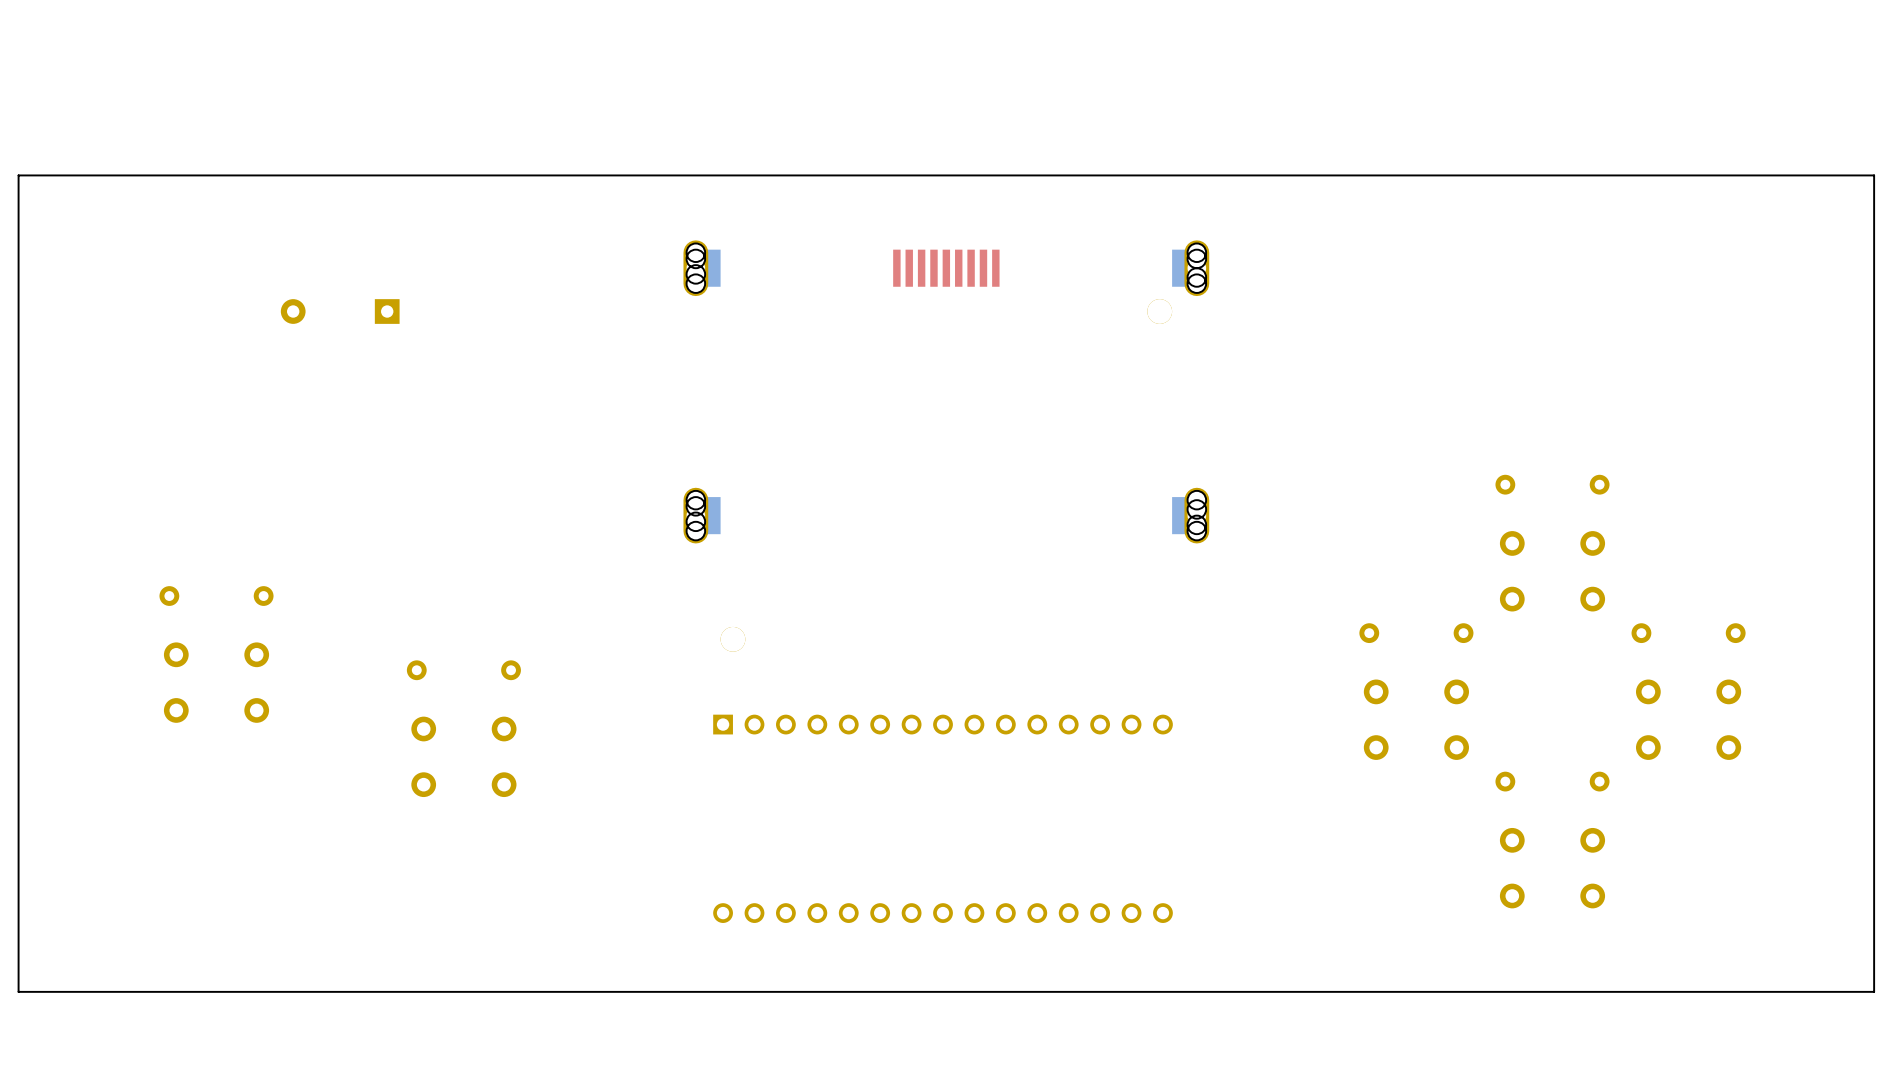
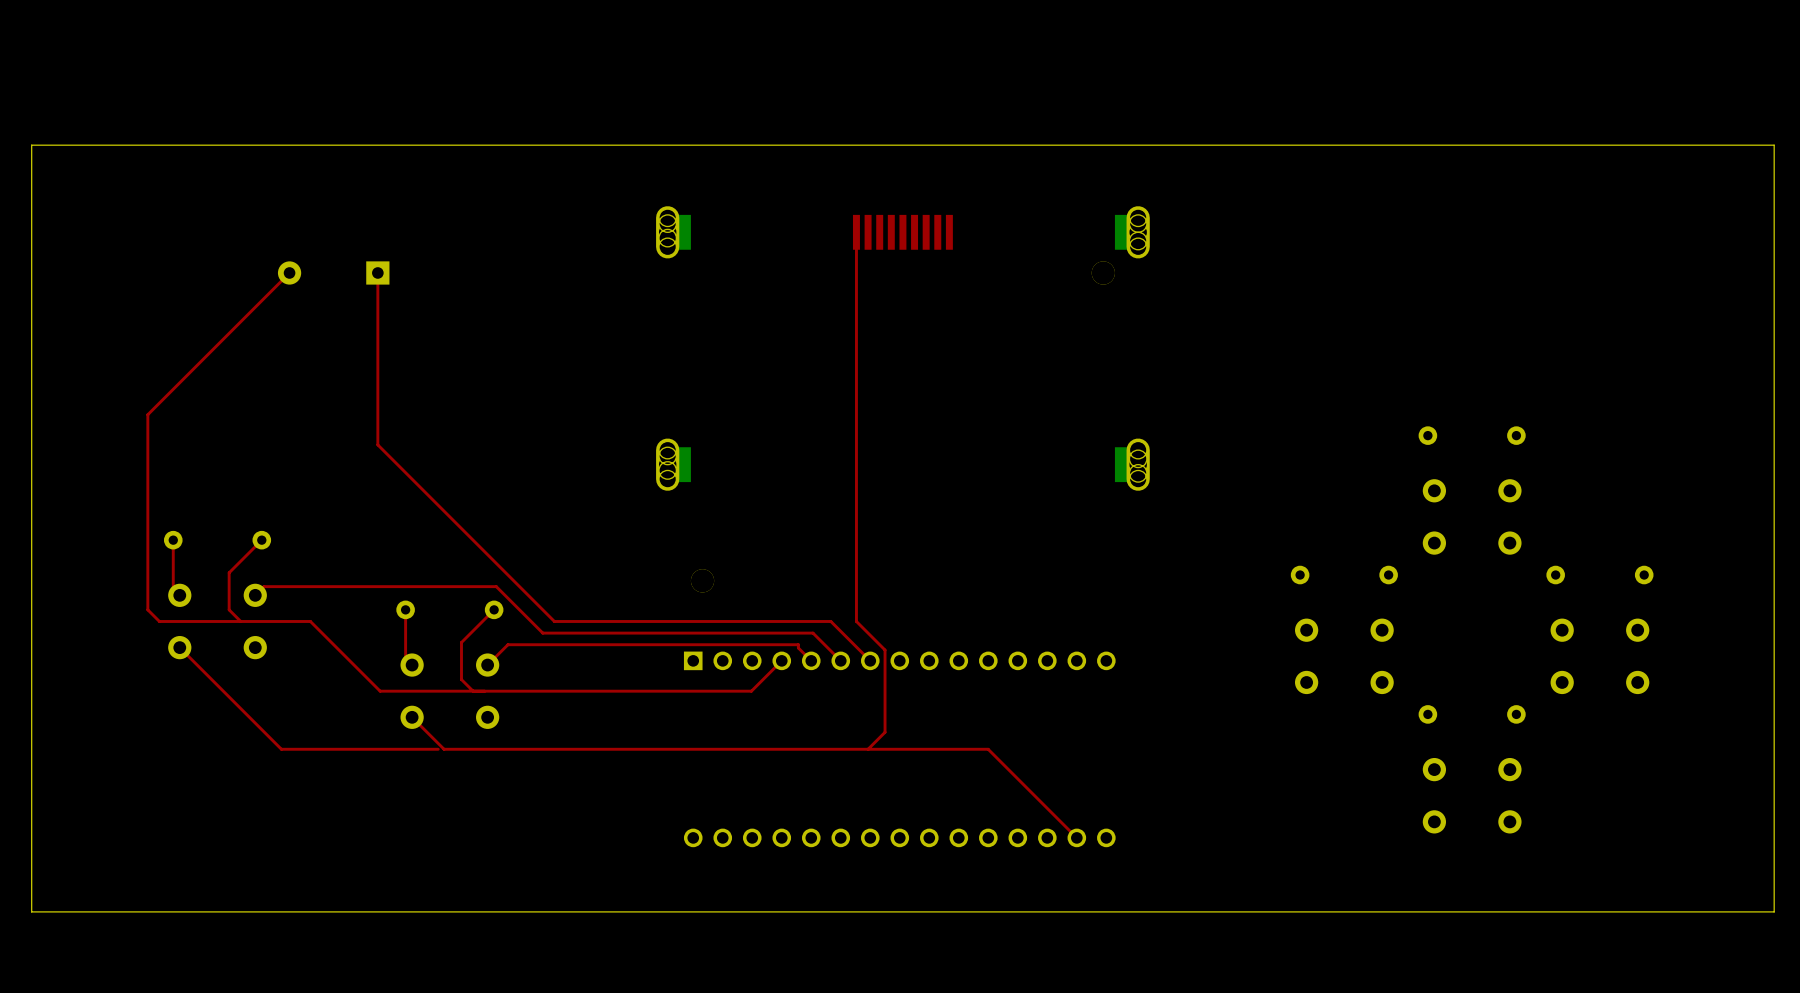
top track: none -> (856, 232) (856, 621) (885, 650) (885, 732) (868, 749)
top track: none -> (289, 272) (147, 414) (147, 609) (159, 621) (310, 621) (380, 691) (751, 691) (781, 660)
top track: none -> (377, 272) (377, 444) (554, 621) (830, 621) (870, 660)
top track: none -> (173, 540) (173, 588) (179, 595)
top track: none -> (261, 540) (229, 572) (229, 609) (240, 621)
top track: none -> (255, 595) (264, 586) (496, 586) (542, 633) (813, 633) (840, 660)
top track: none -> (405, 609) (405, 658) (412, 665)
top track: none -> (494, 609) (461, 642) (461, 679) (473, 691)
top track: none -> (179, 647) (281, 749) (438, 749)
top track: none -> (811, 660) (798, 647) (798, 644) (507, 644) (487, 665)
top track: none -> (412, 717) (444, 749) (988, 749) (1076, 837)

